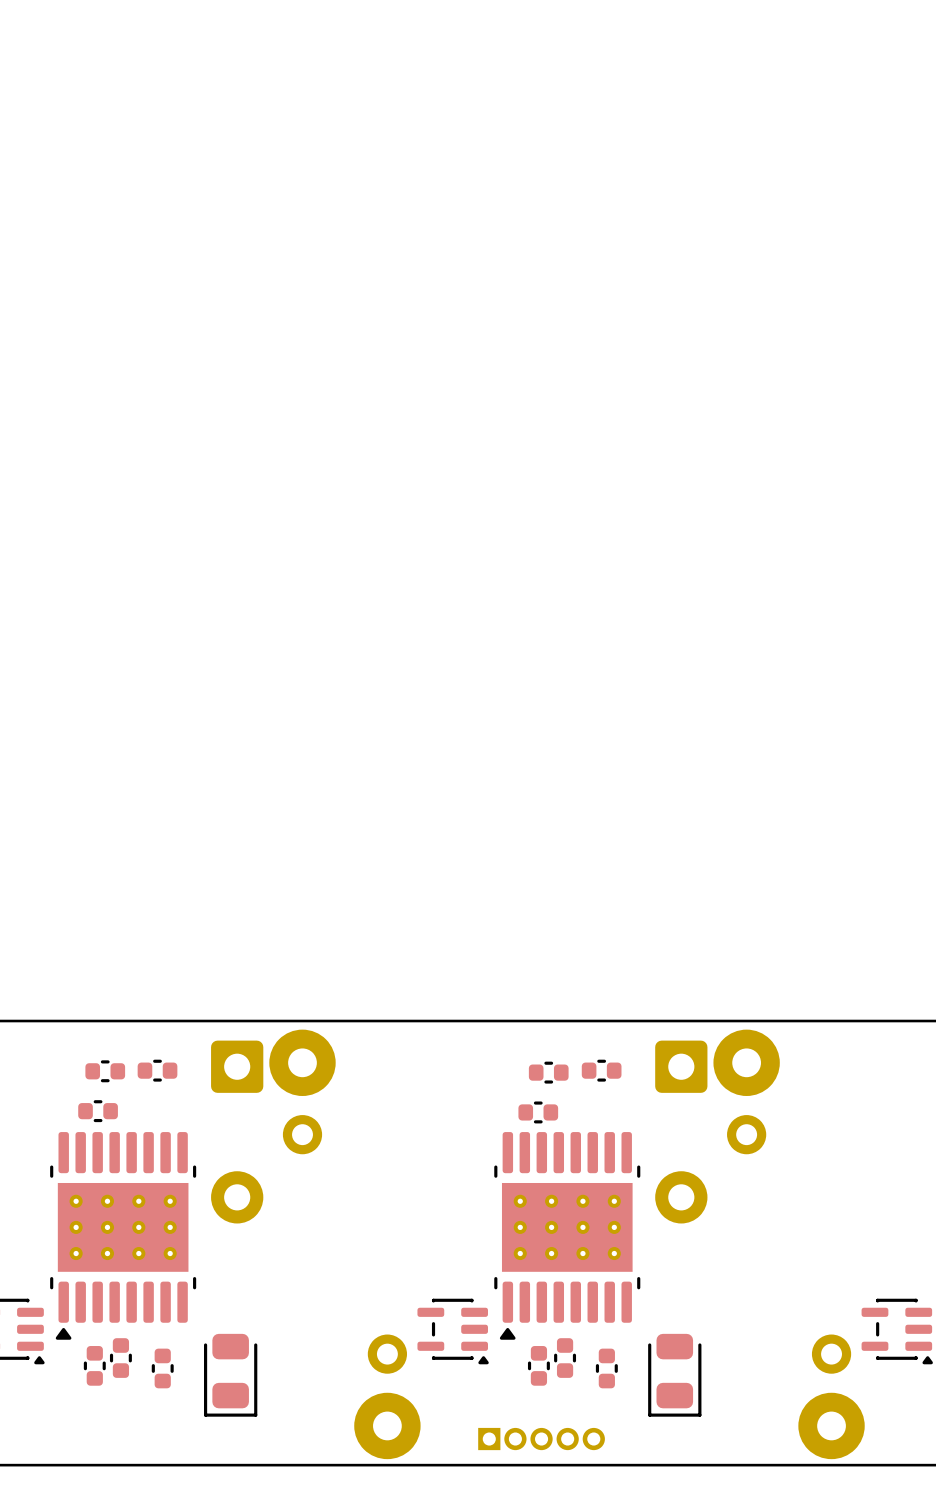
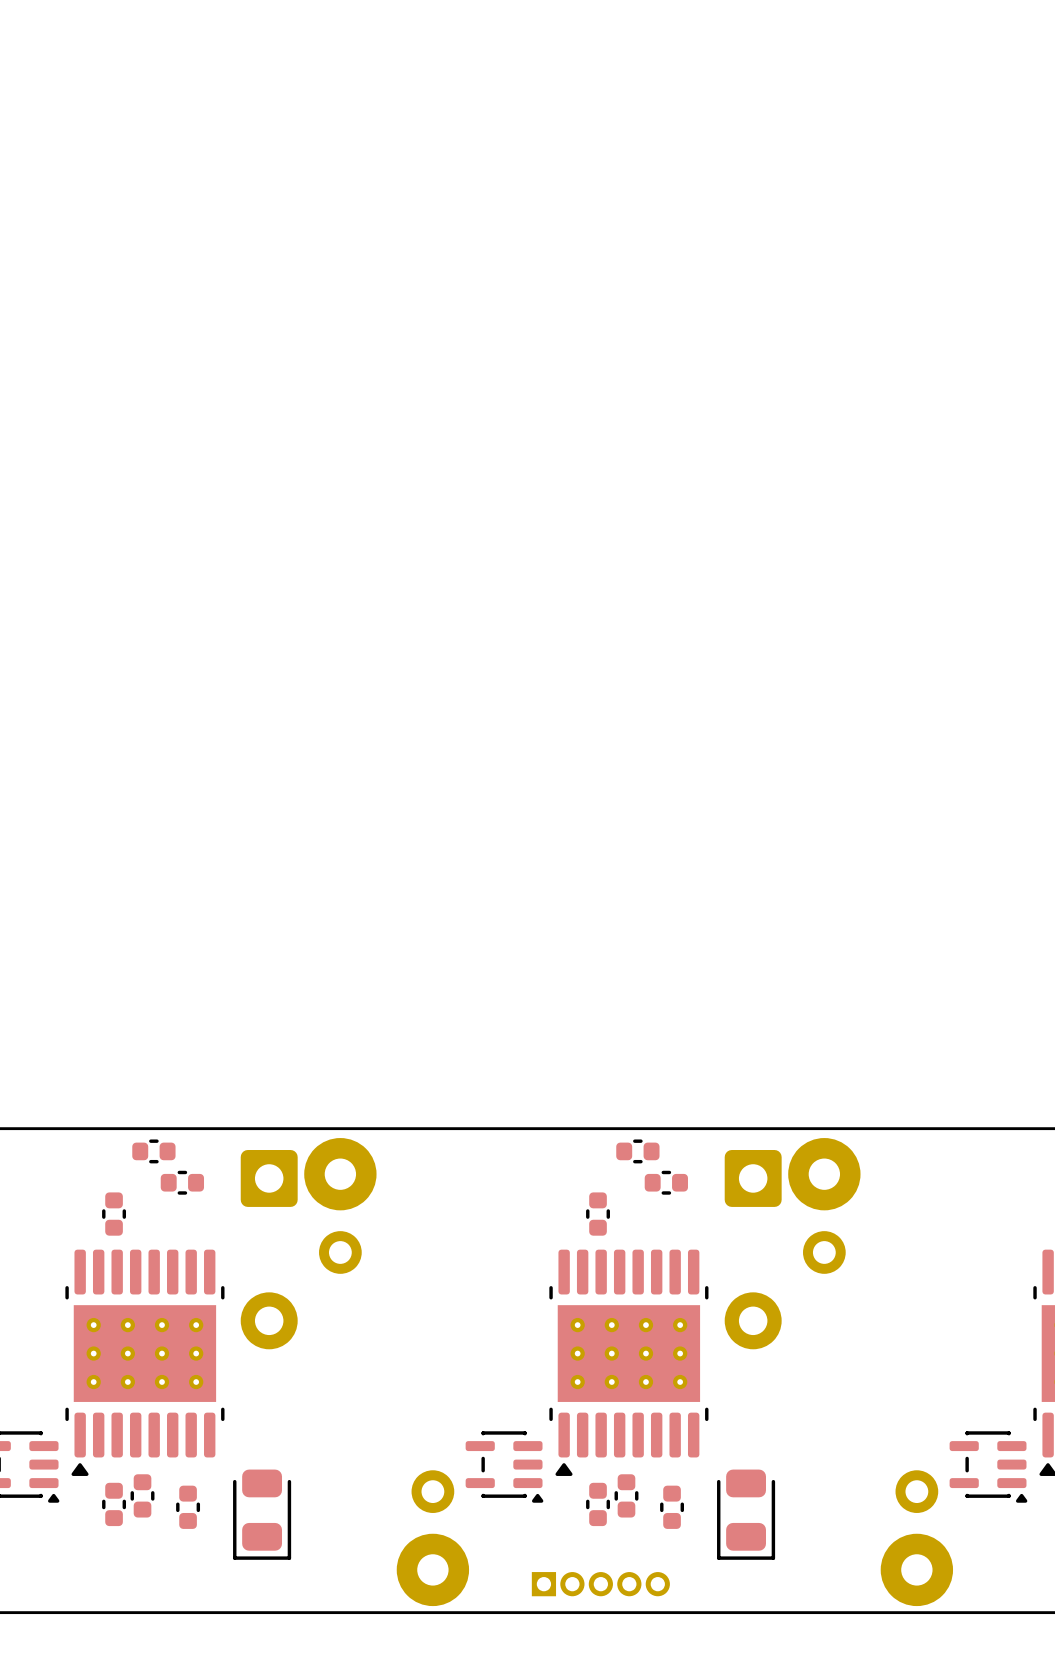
part position: (105, 1071) -> (153, 1151)
part position: (548, 1072) -> (637, 1151)
part rotation: 0° (98, 1111) -> 90° clockwise (114, 1214)
part rotation: 0° (538, 1112) -> 90° clockwise (598, 1214)

